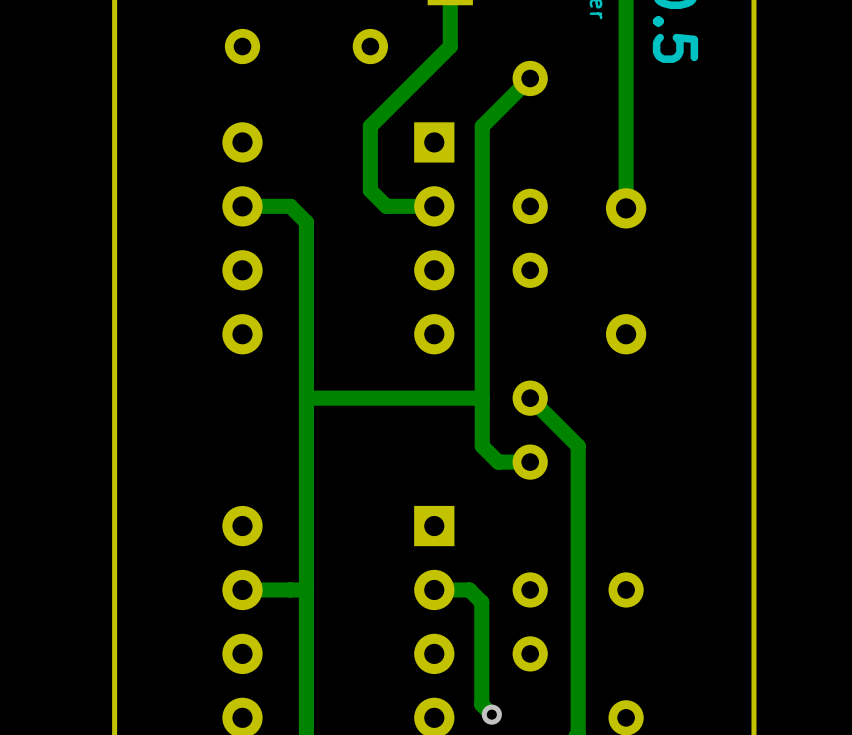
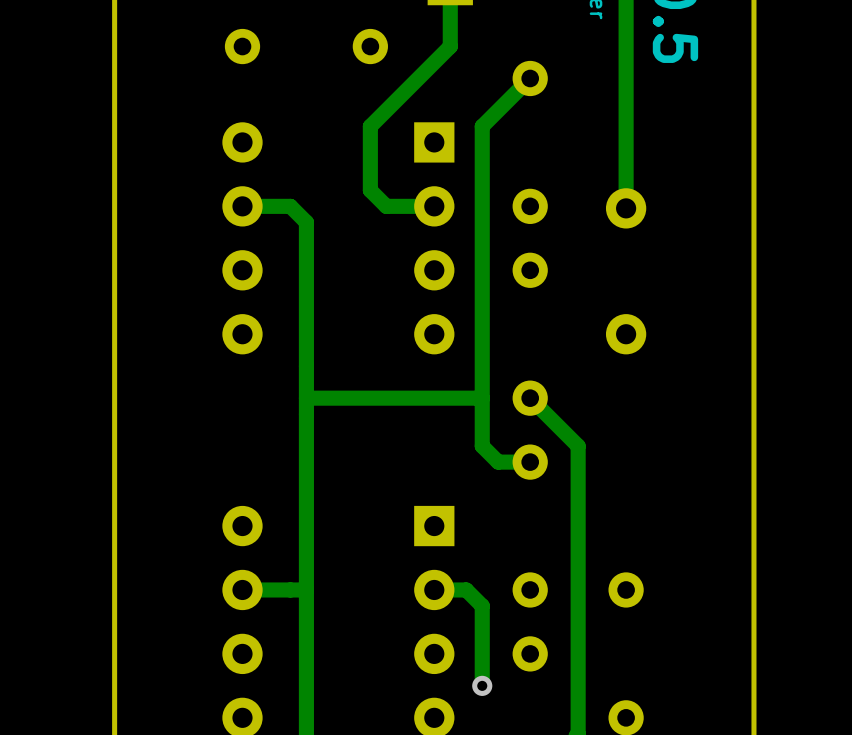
track: (466, 589) (469, 589) (481, 602) (481, 704) (491, 714) -> (466, 589) (482, 605) (482, 685)
via position: (491, 714) -> (482, 685)

